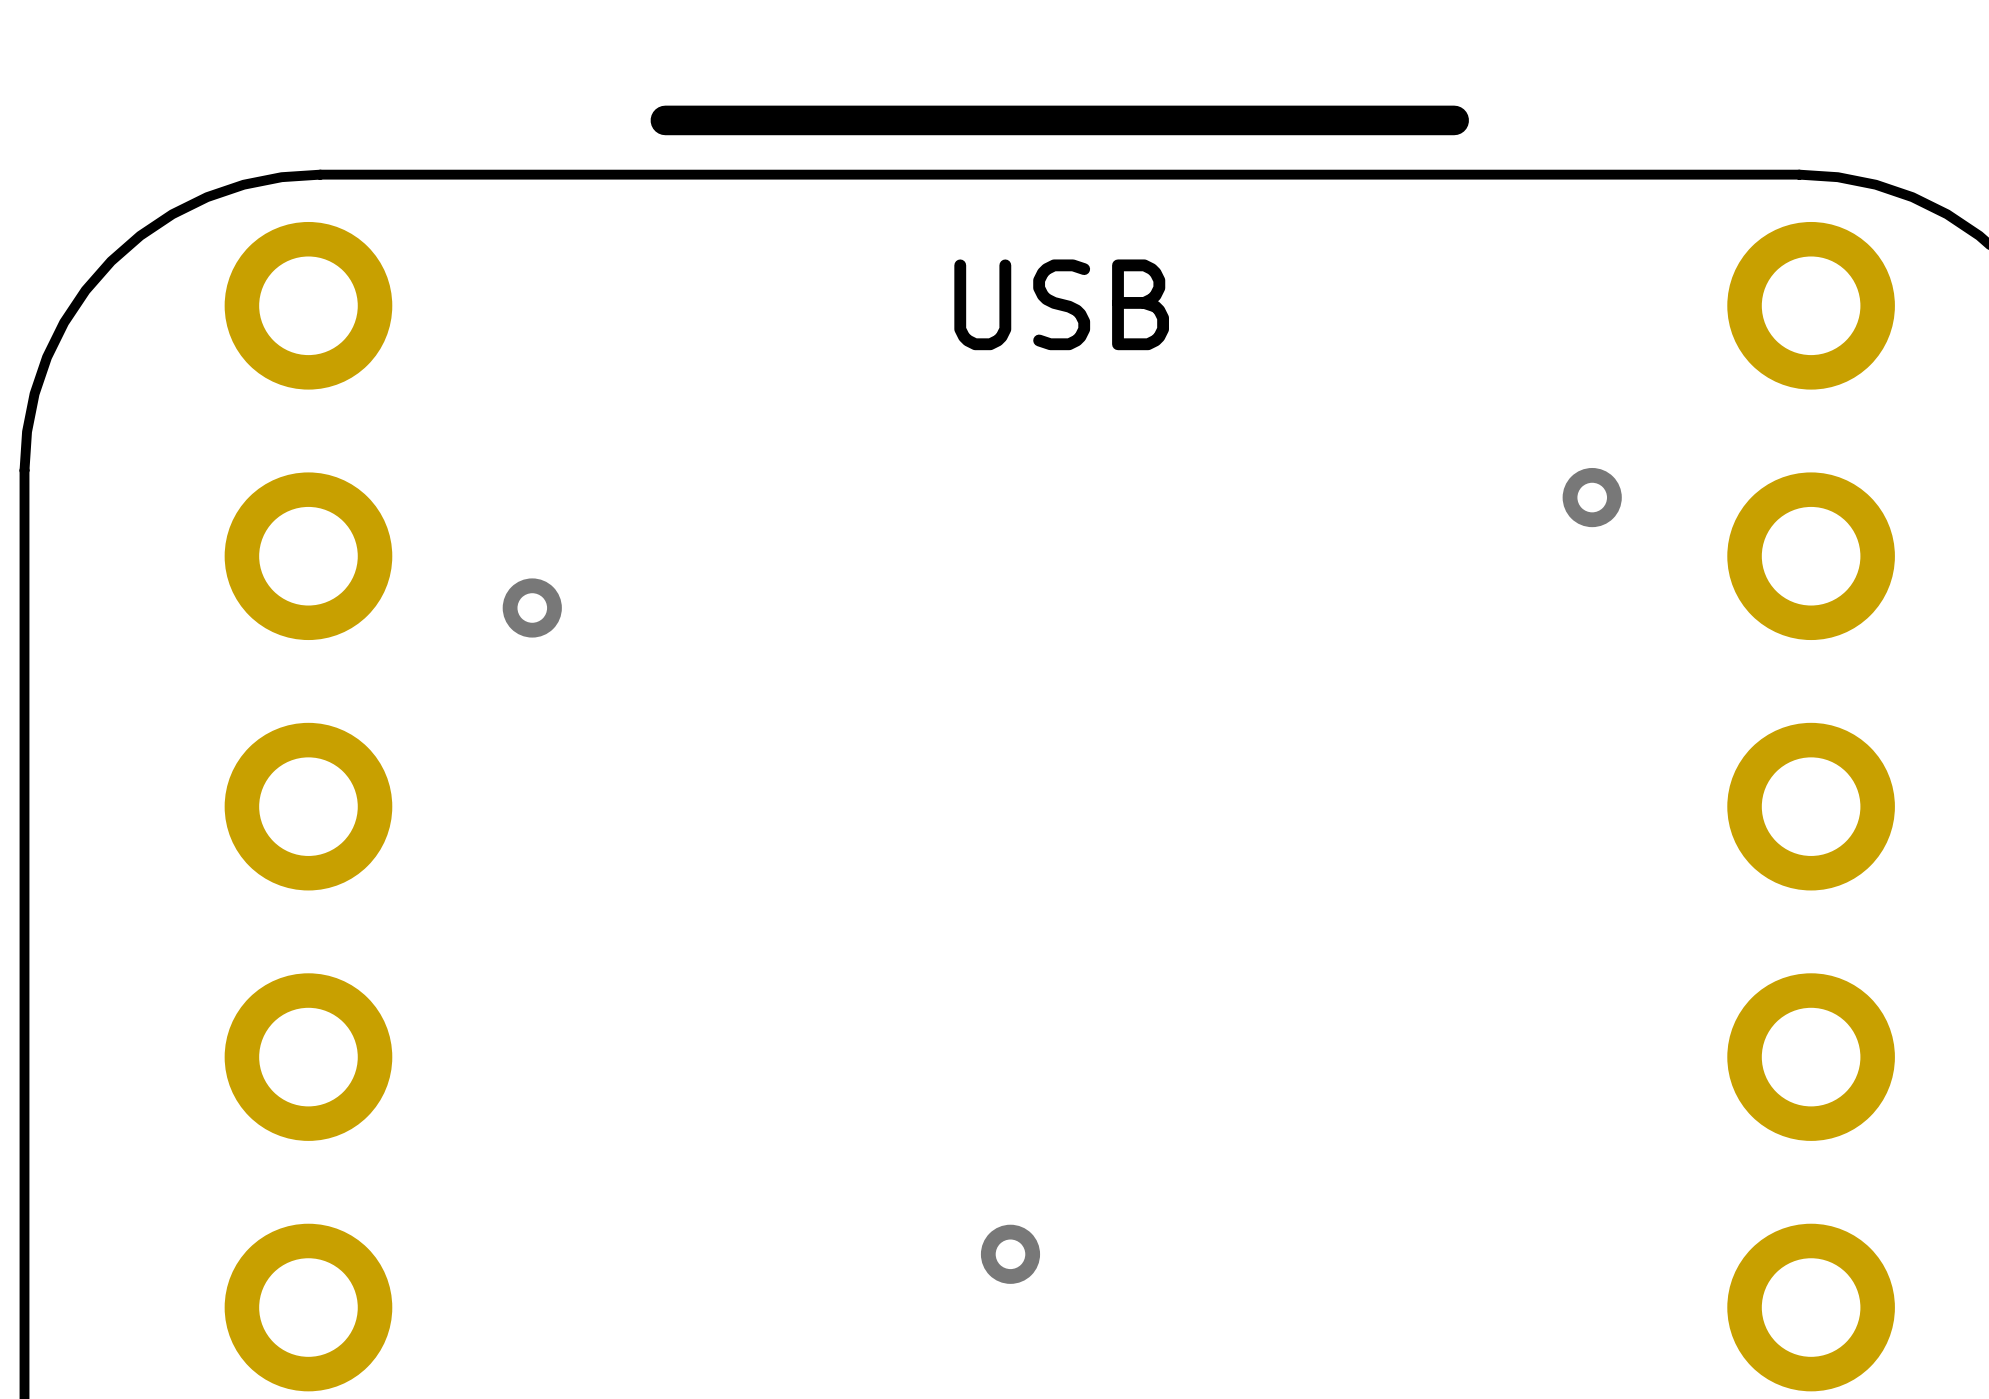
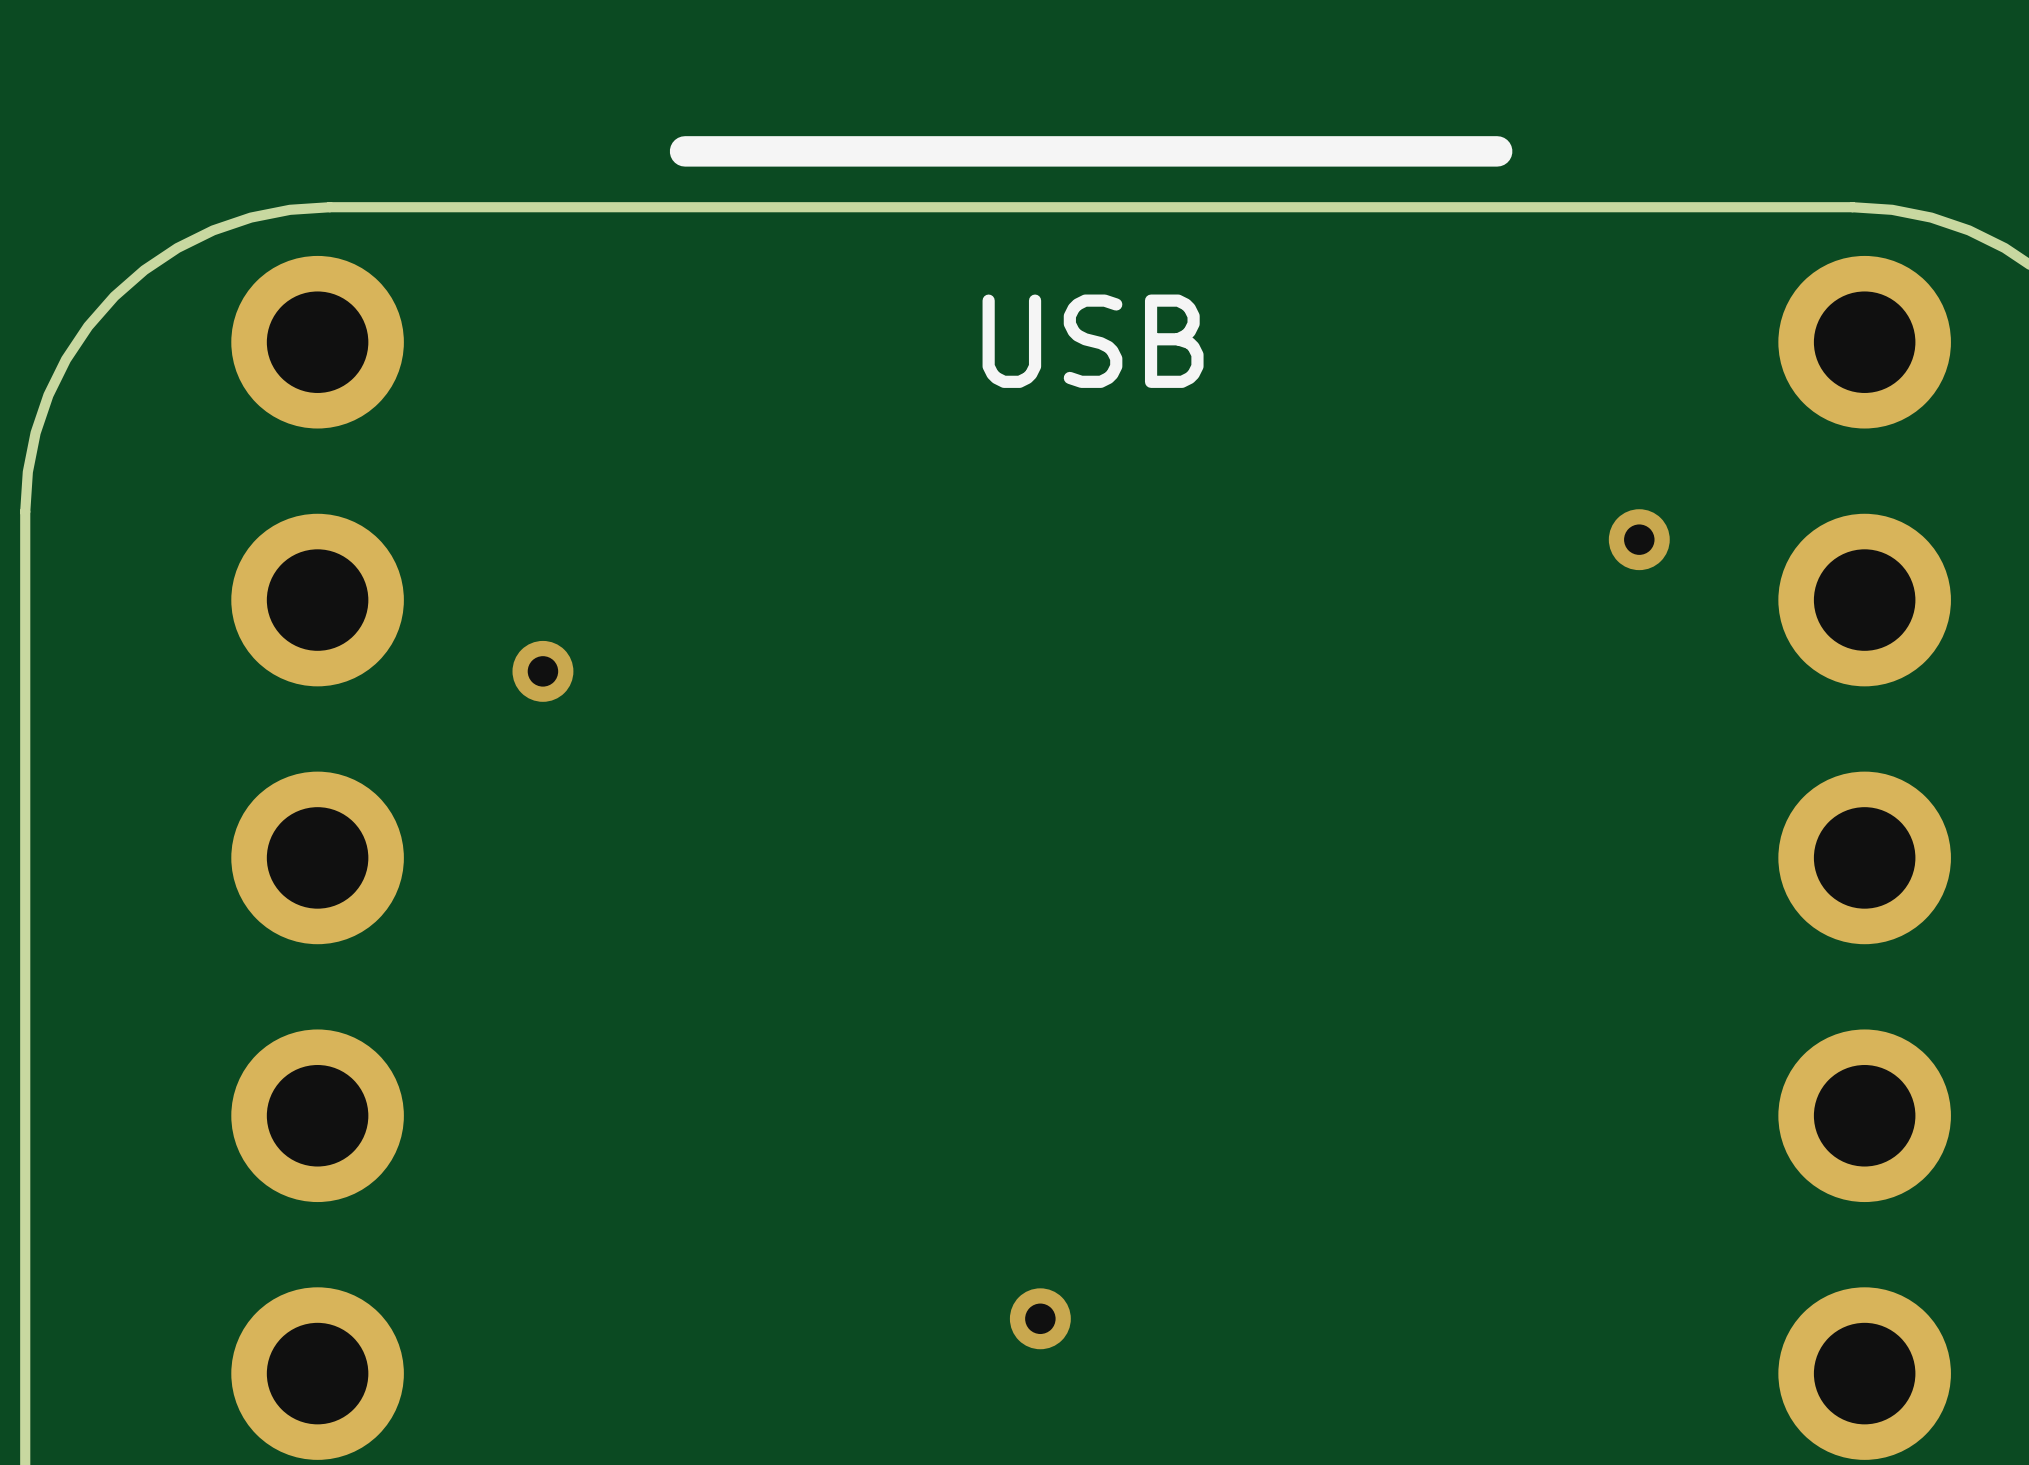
via position: (532, 607) -> (542, 671)

